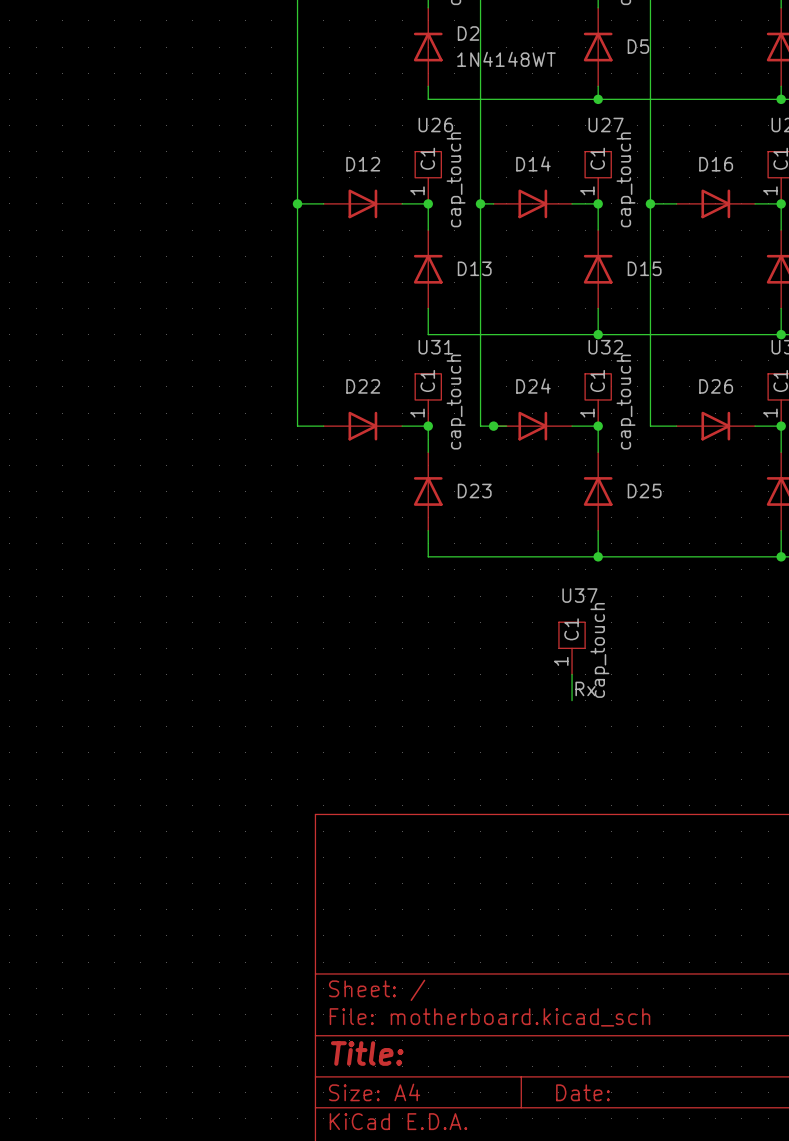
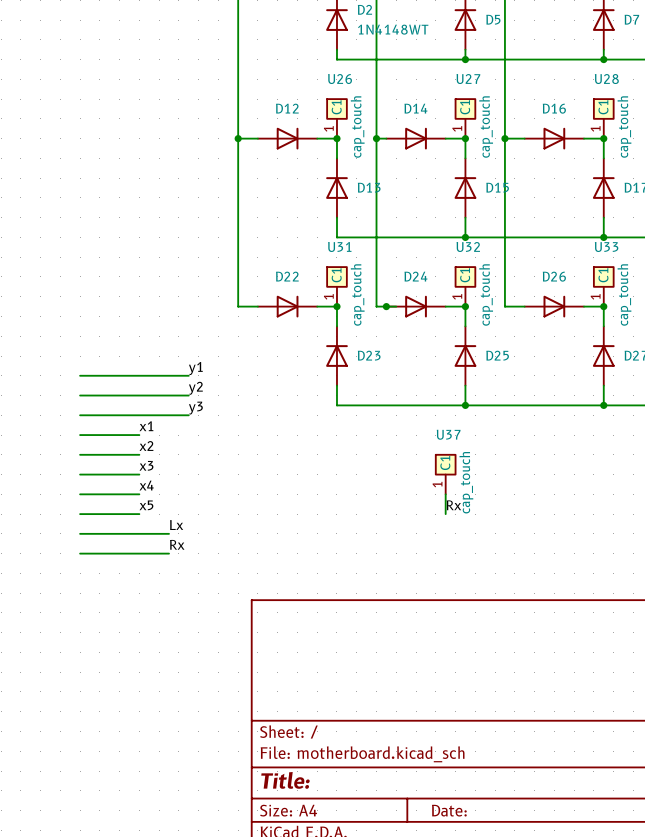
label: none -> y1 (195, 368)
wire: none -> (80, 375) (188, 375)
label: none -> y2 (195, 388)
wire: none -> (80, 395) (188, 395)
label: none -> y3 (195, 408)
wire: none -> (80, 415) (188, 415)
label: none -> x1 (146, 426)
wire: none -> (80, 435) (139, 435)
label: none -> x2 (146, 446)
wire: none -> (80, 454) (139, 454)
label: none -> x3 (146, 465)
wire: none -> (80, 474) (139, 474)
label: none -> x4 (146, 485)
wire: none -> (80, 494) (139, 494)
label: none -> x5 (146, 505)
wire: none -> (80, 514) (139, 514)
label: none -> Lx (176, 525)
wire: none -> (80, 533) (169, 533)
label: none -> Rx (177, 544)
wire: none -> (80, 553) (169, 553)

